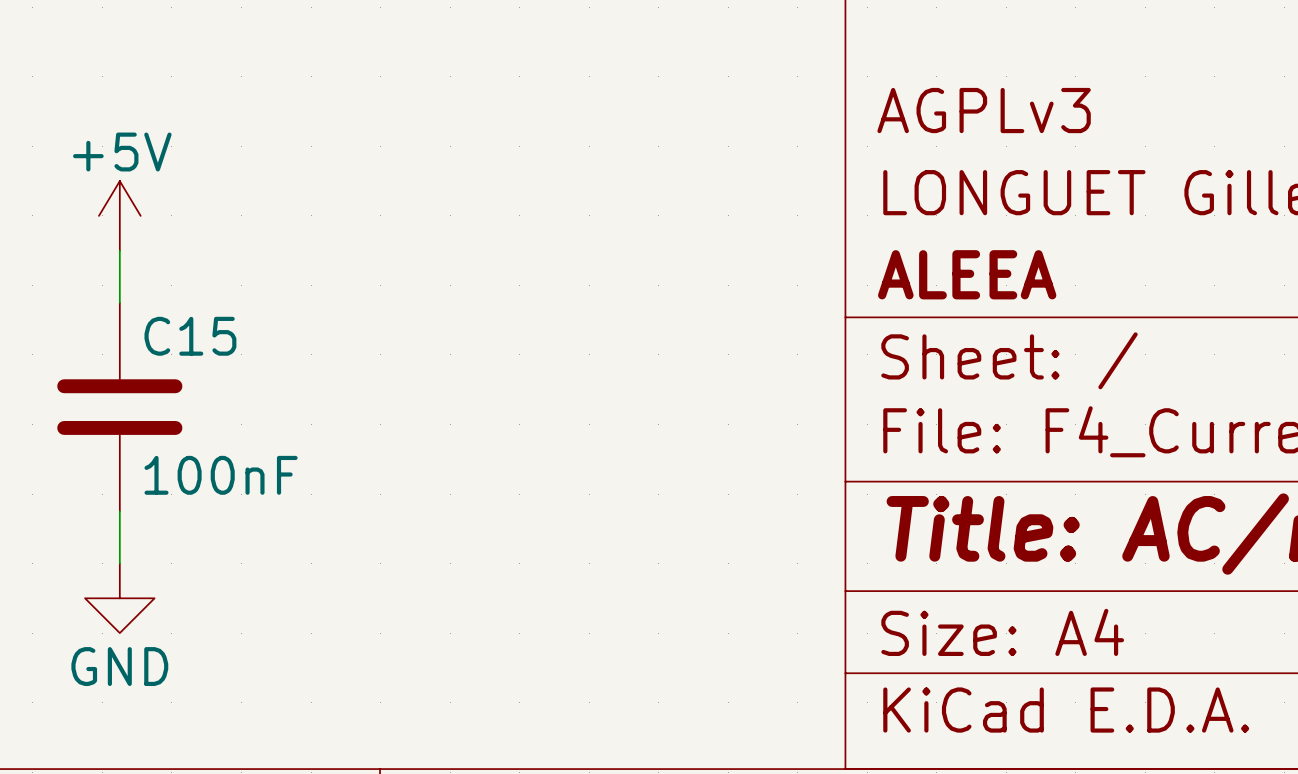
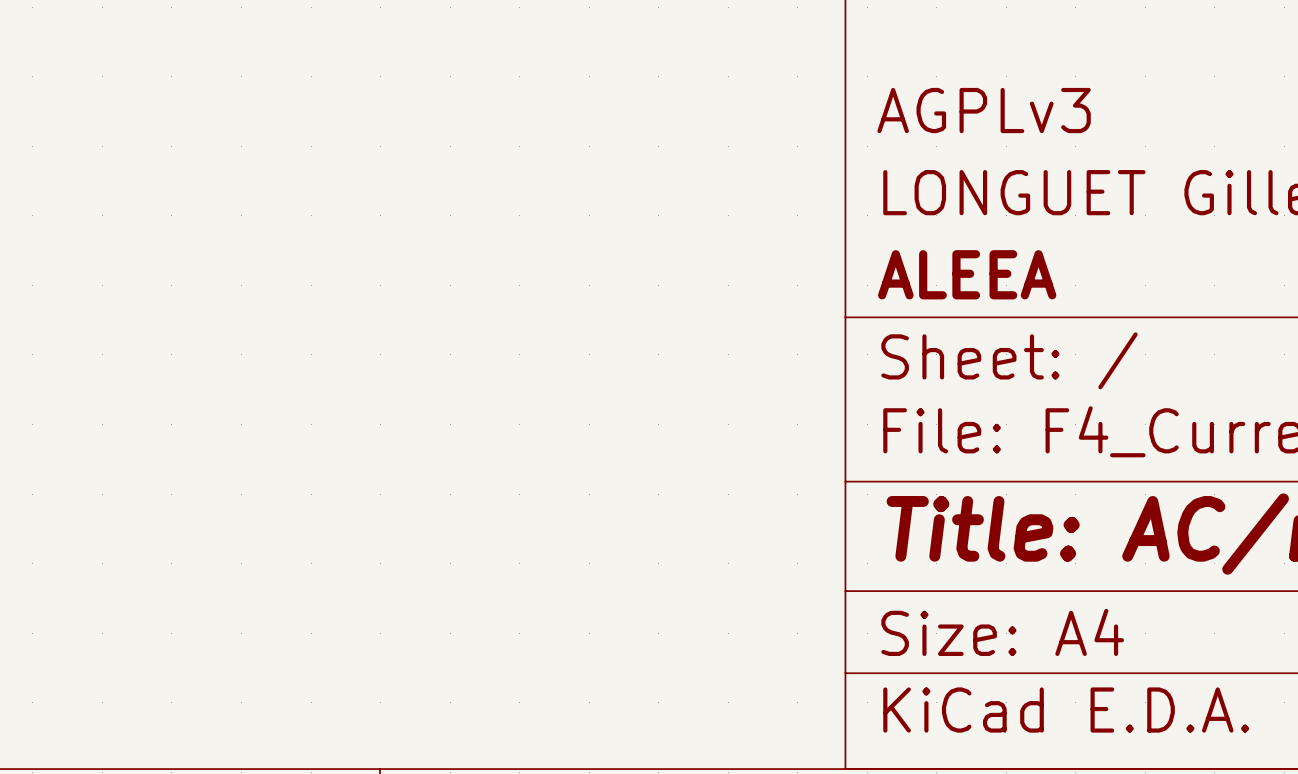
power symbol: +5V (119, 215) -> none
wire: (119, 250) (119, 302) -> none
C15: 100nF (119, 407) -> none
wire: (119, 511) (119, 563) -> none
power symbol: GND (119, 598) -> none

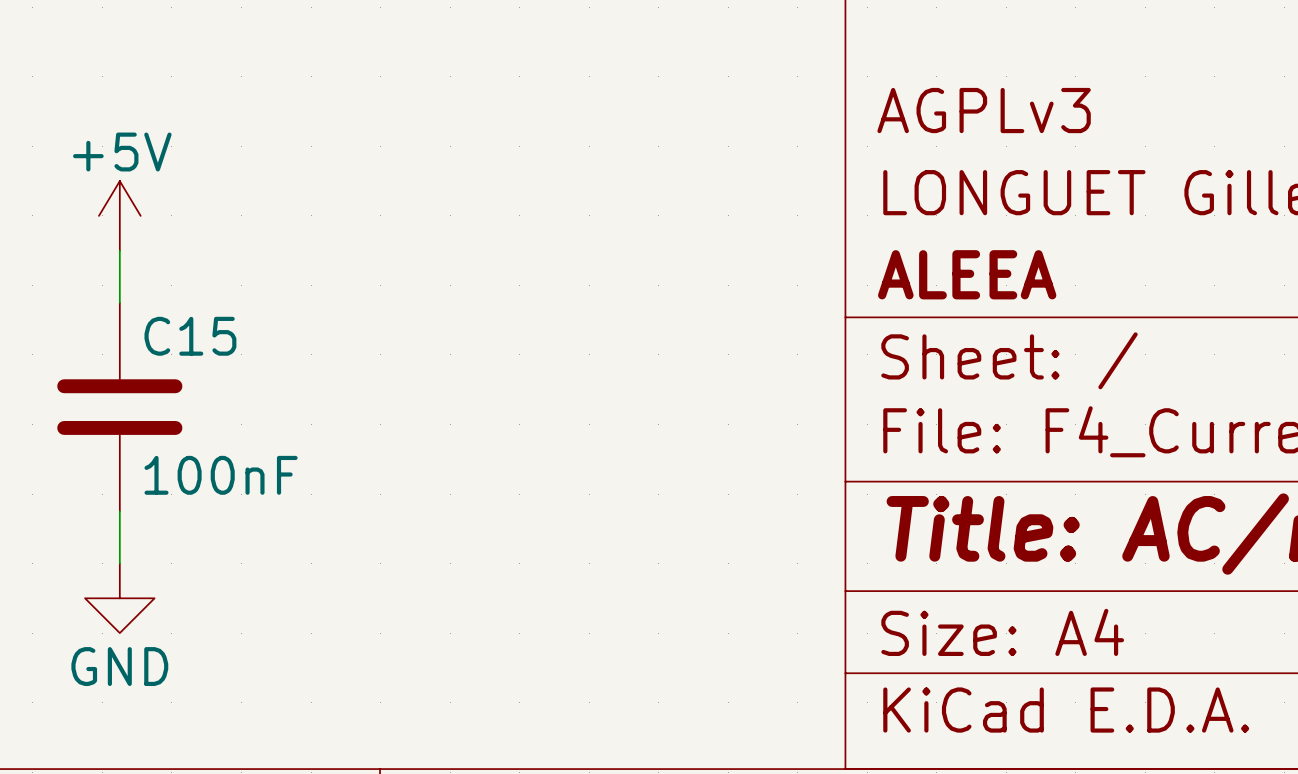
power symbol: none -> +5V (119, 215)
wire: none -> (119, 250) (119, 302)
C15: none -> 100nF (119, 407)
wire: none -> (119, 511) (119, 563)
power symbol: none -> GND (119, 598)

